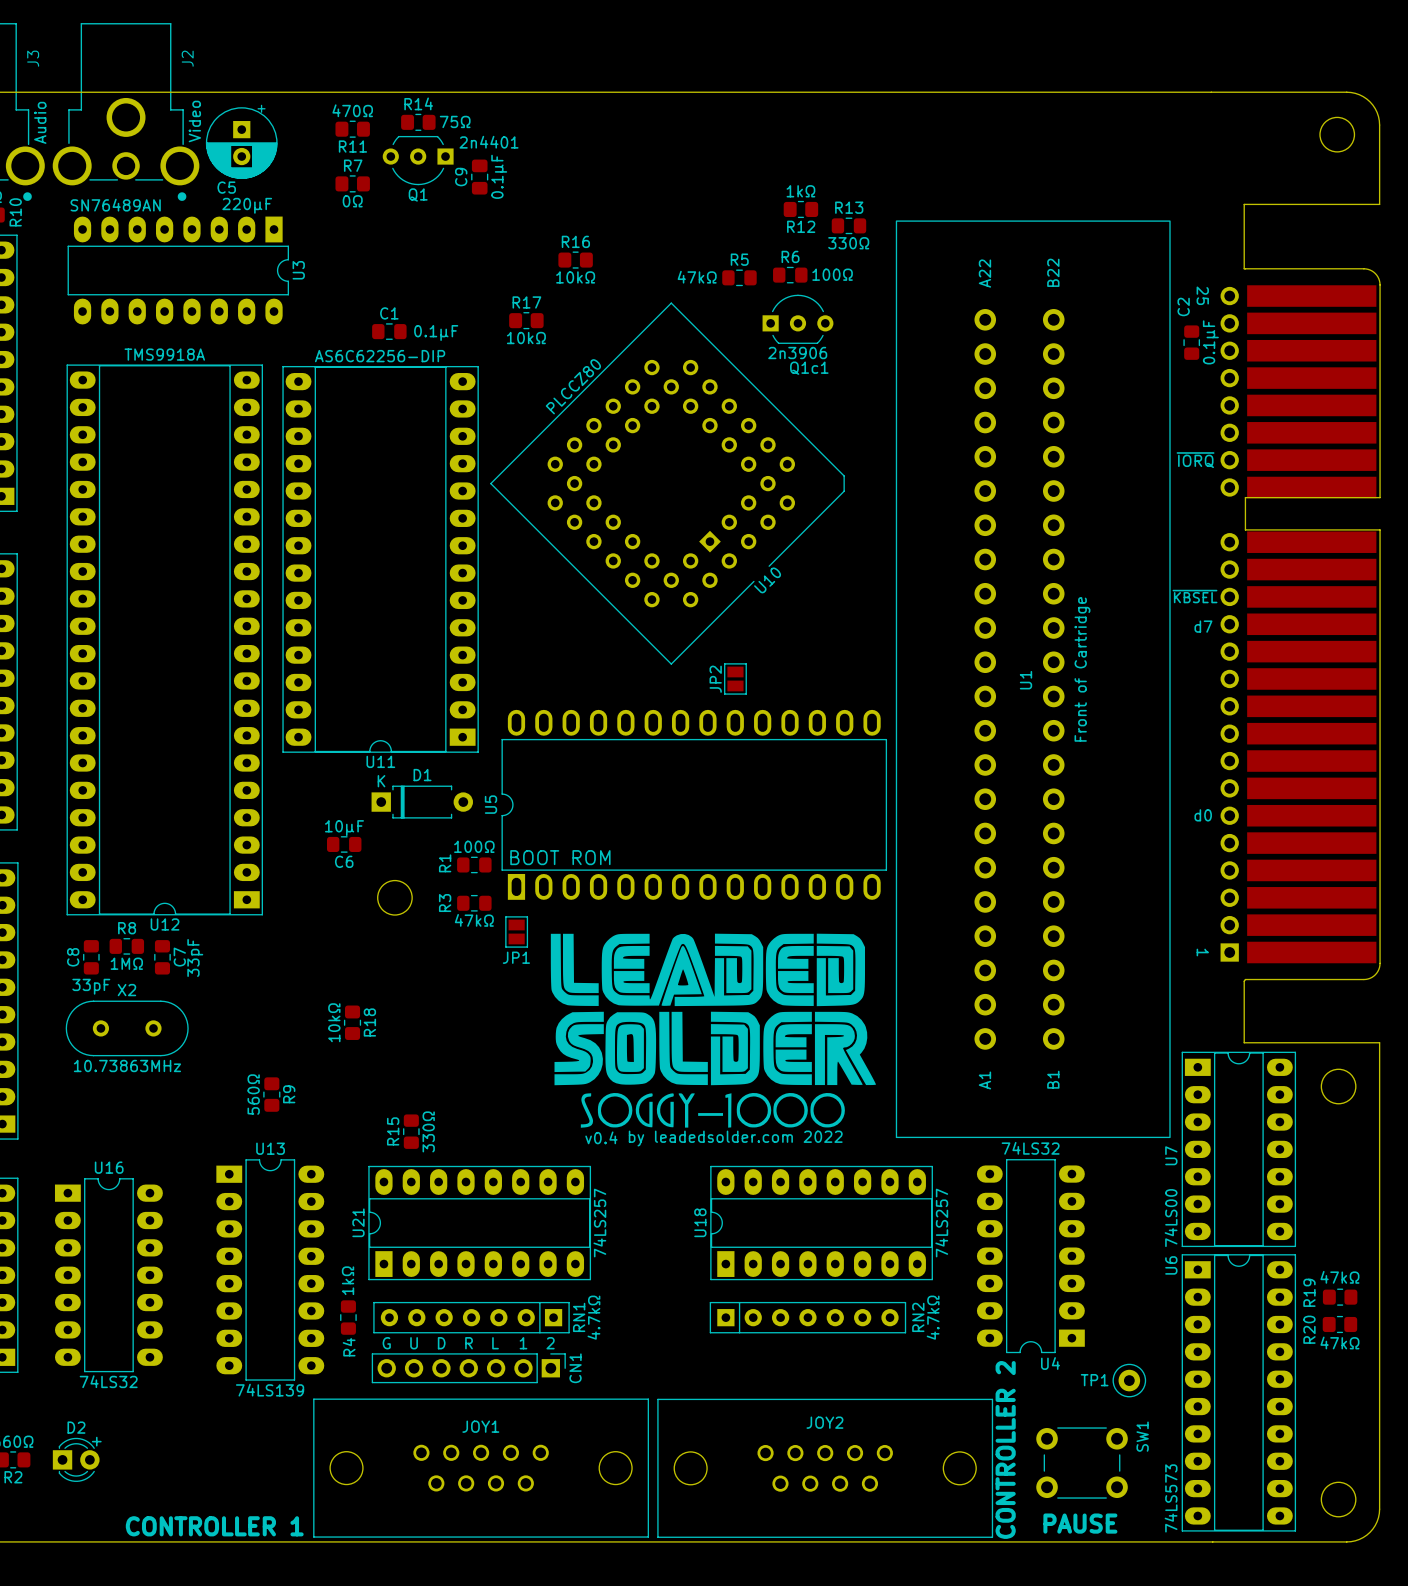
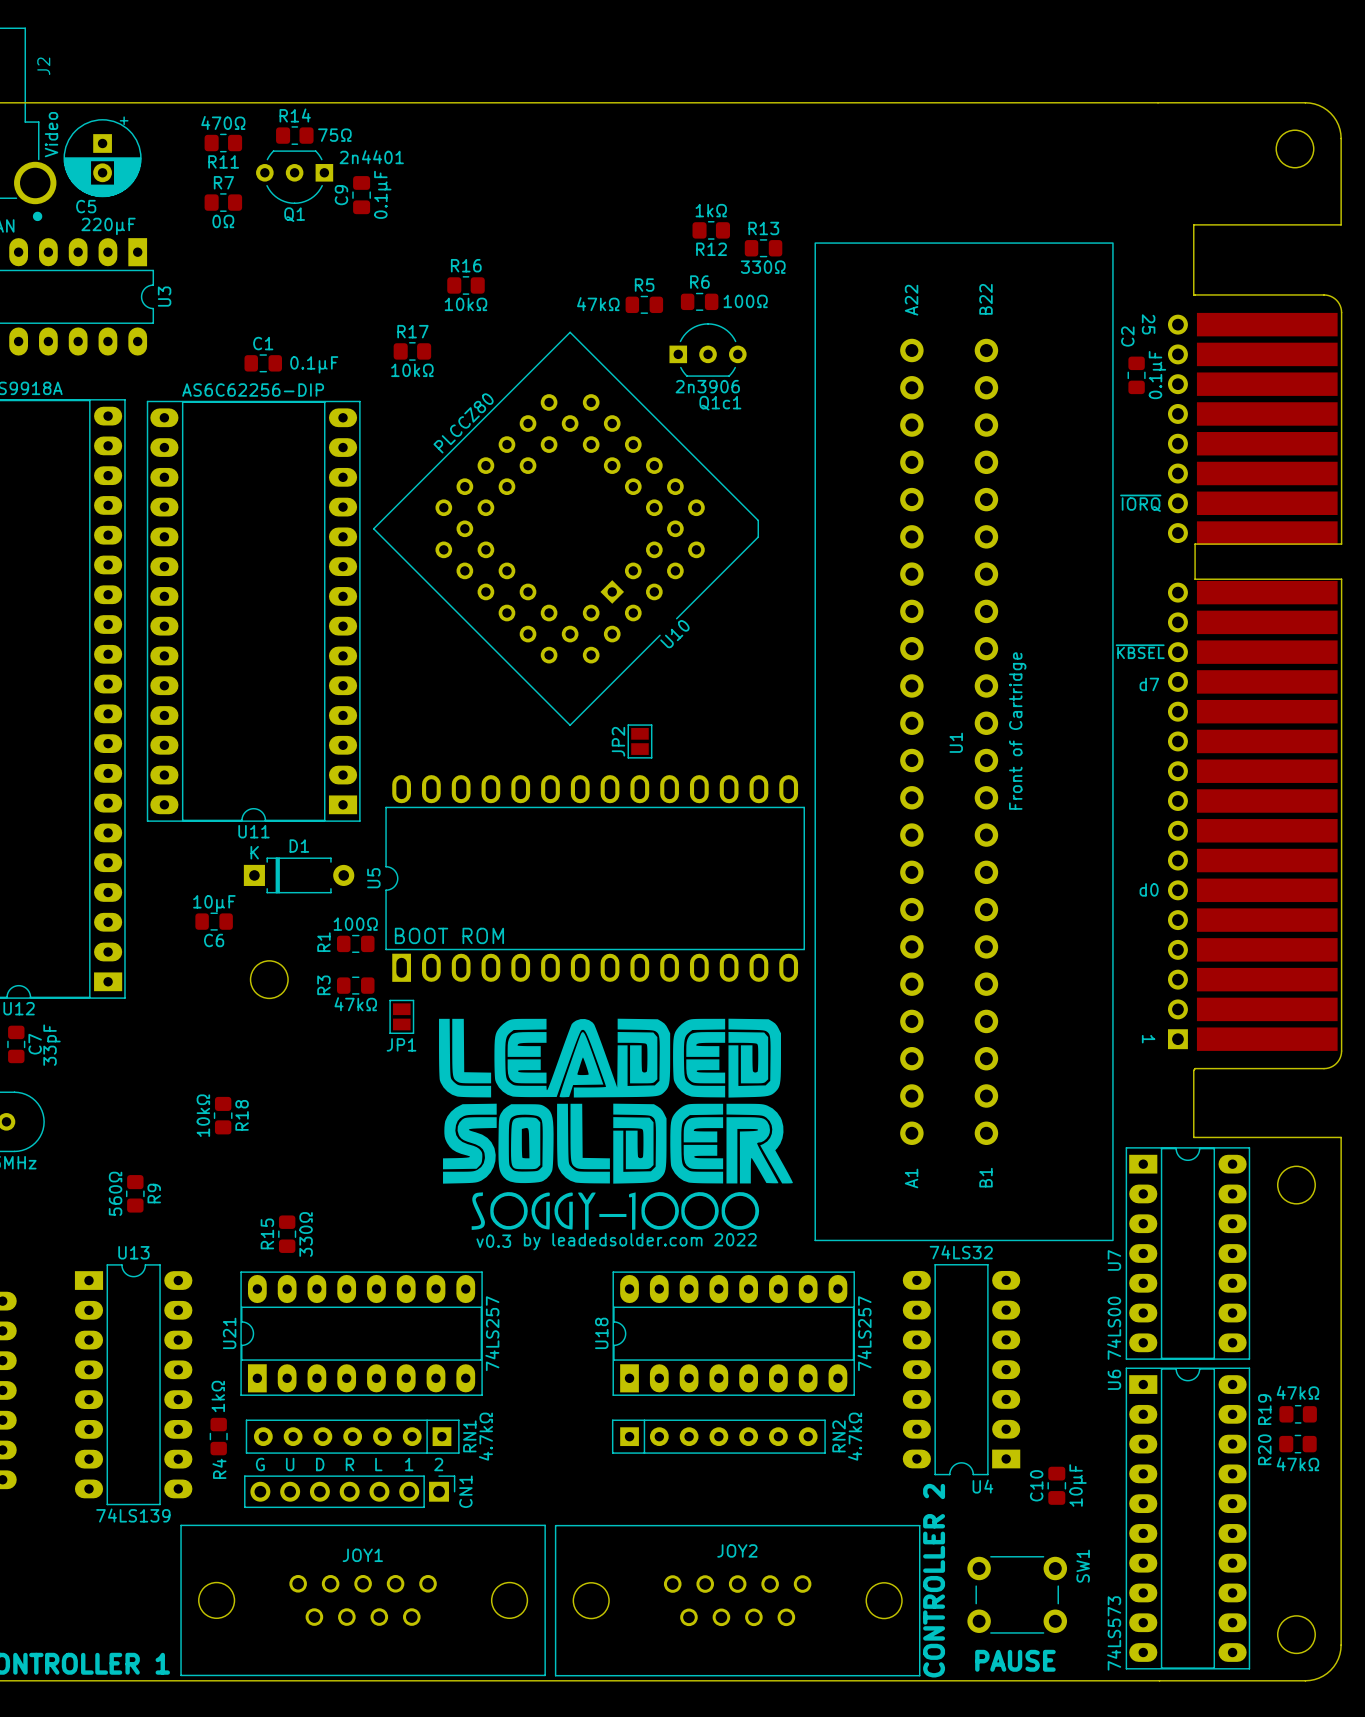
text: v0.4 (601, 1137) -> v0.3 (493, 1241)
C10: none -> 10µF (1056, 1485)
TP1: (1129, 1380) -> none

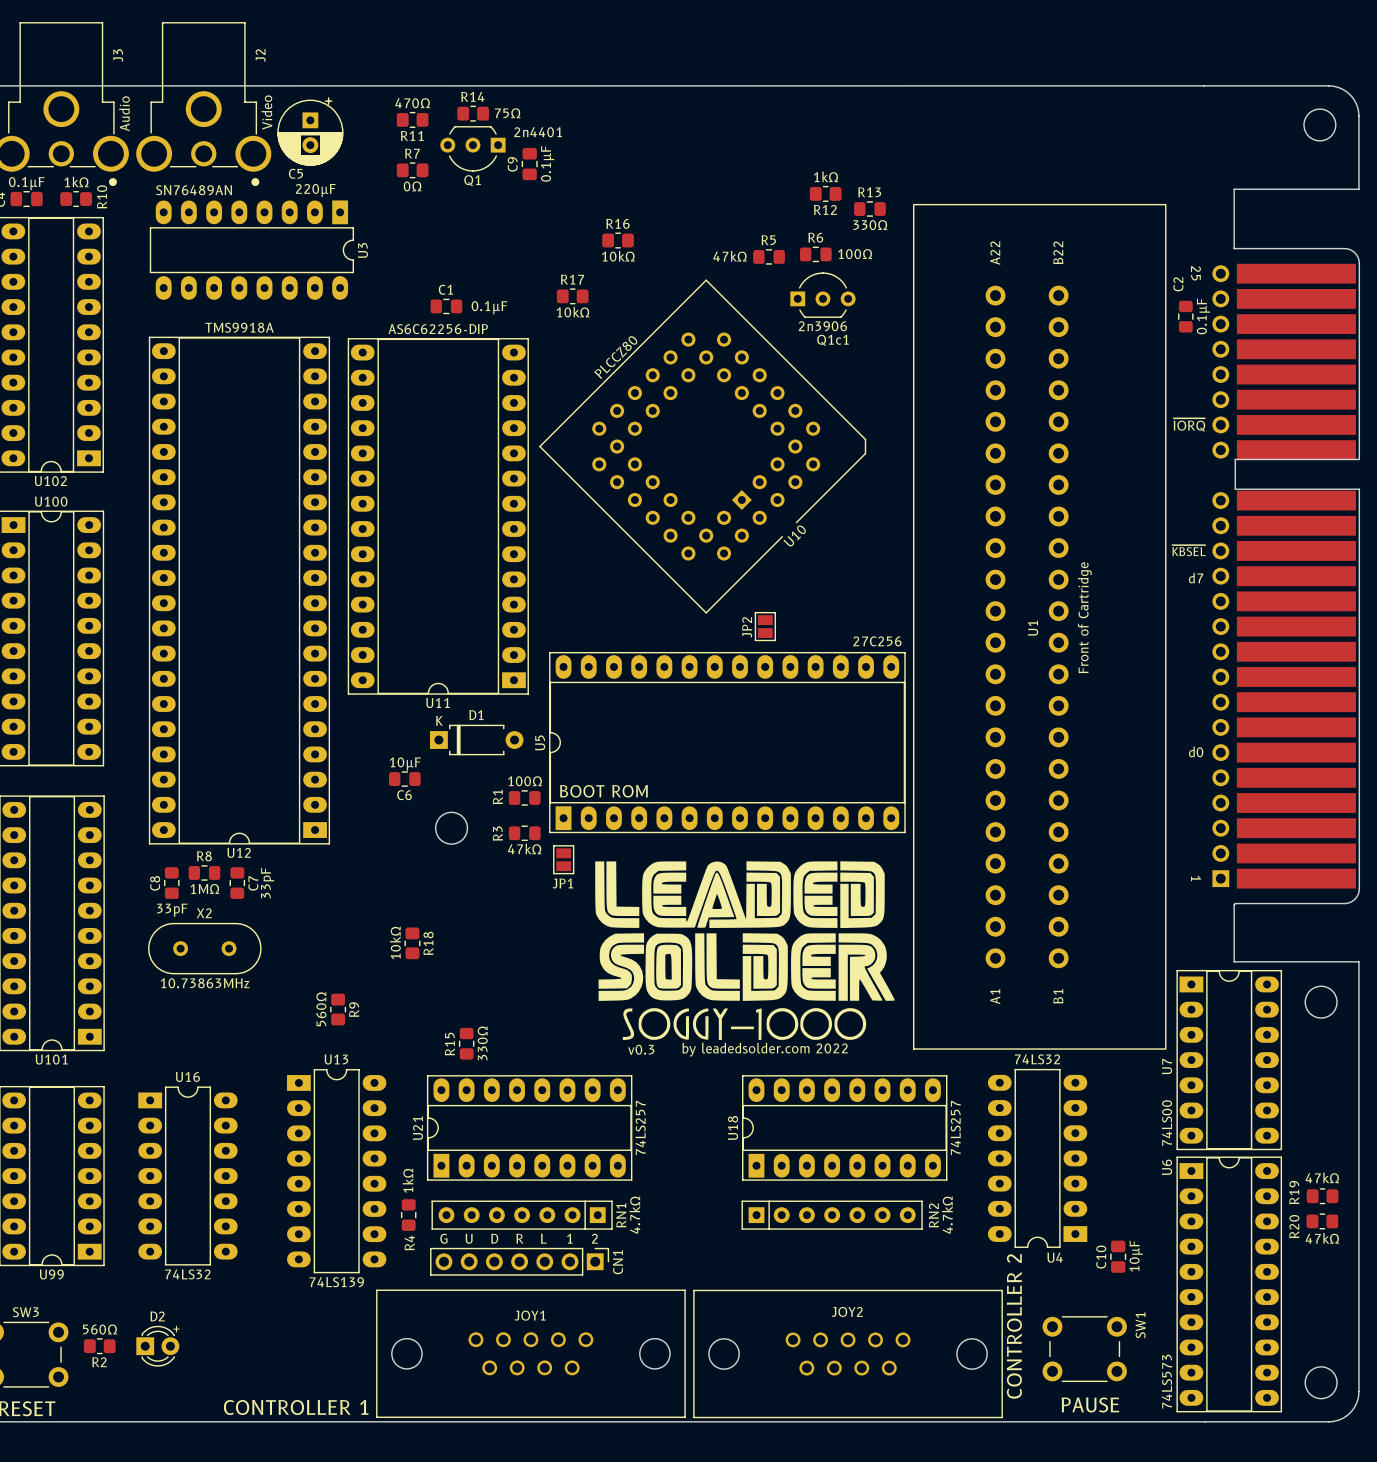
U5 value: none -> 27C256 (877, 641)
U5 footprint: [385, 775, 805, 982] -> [549, 652, 906, 834]

